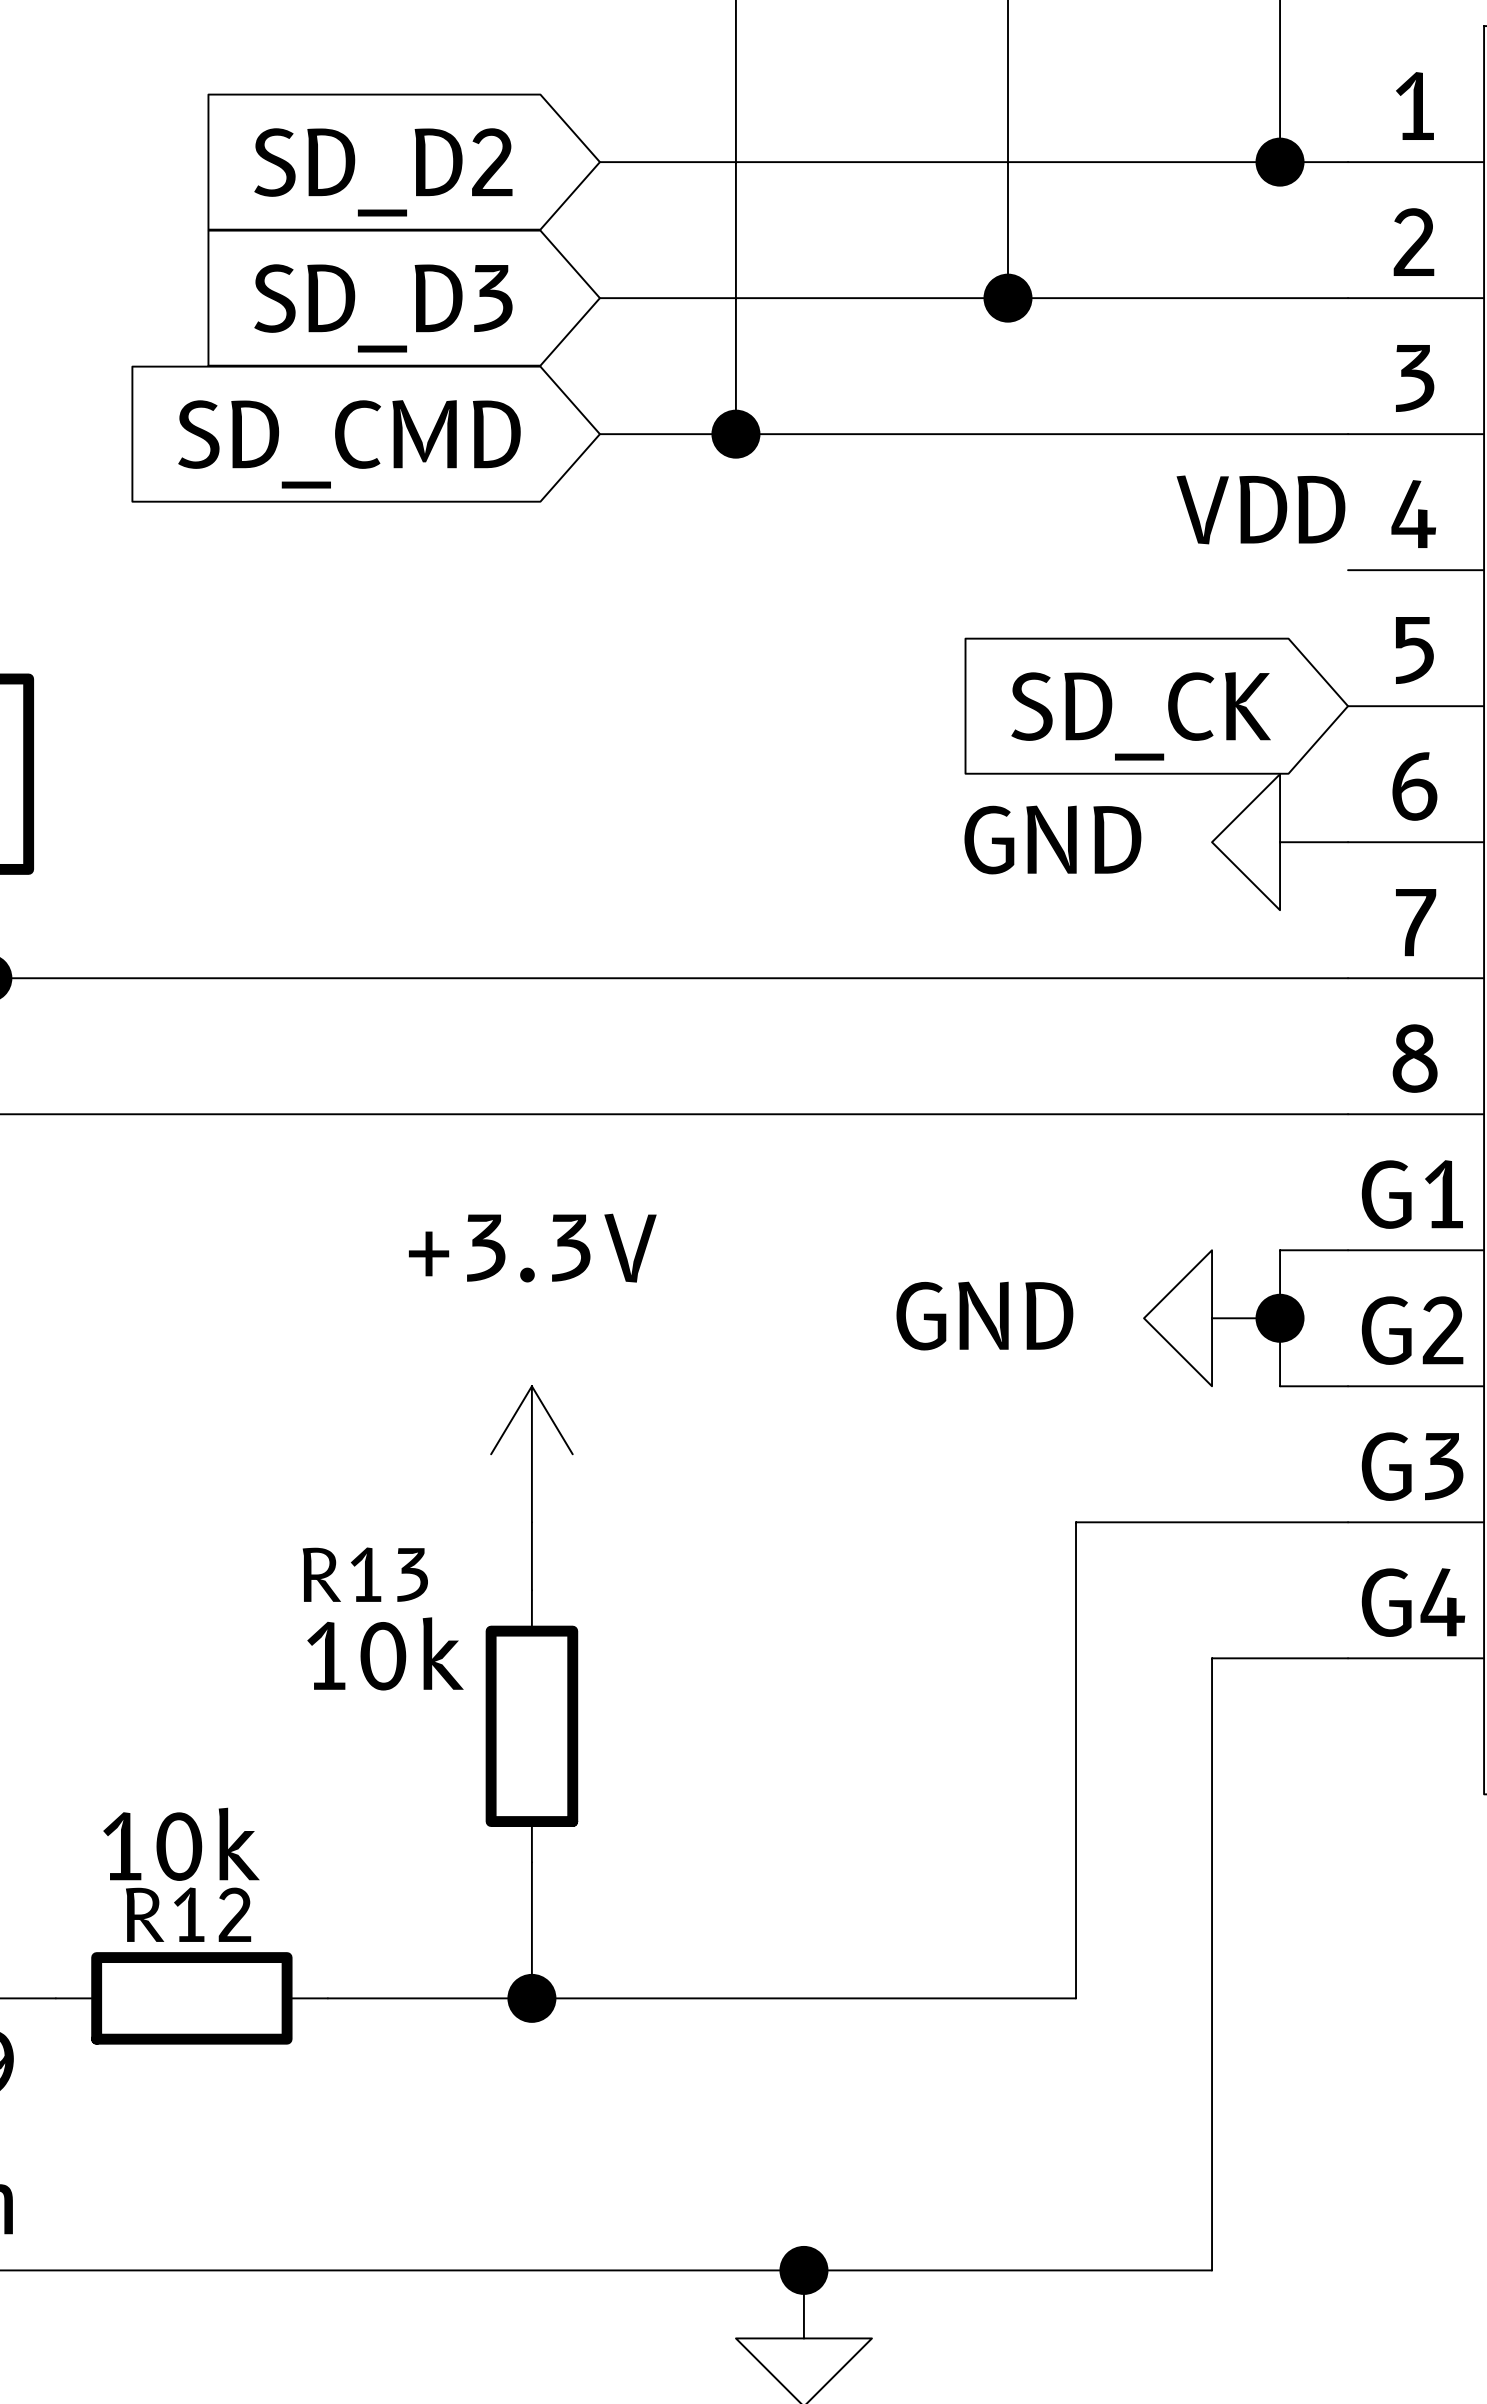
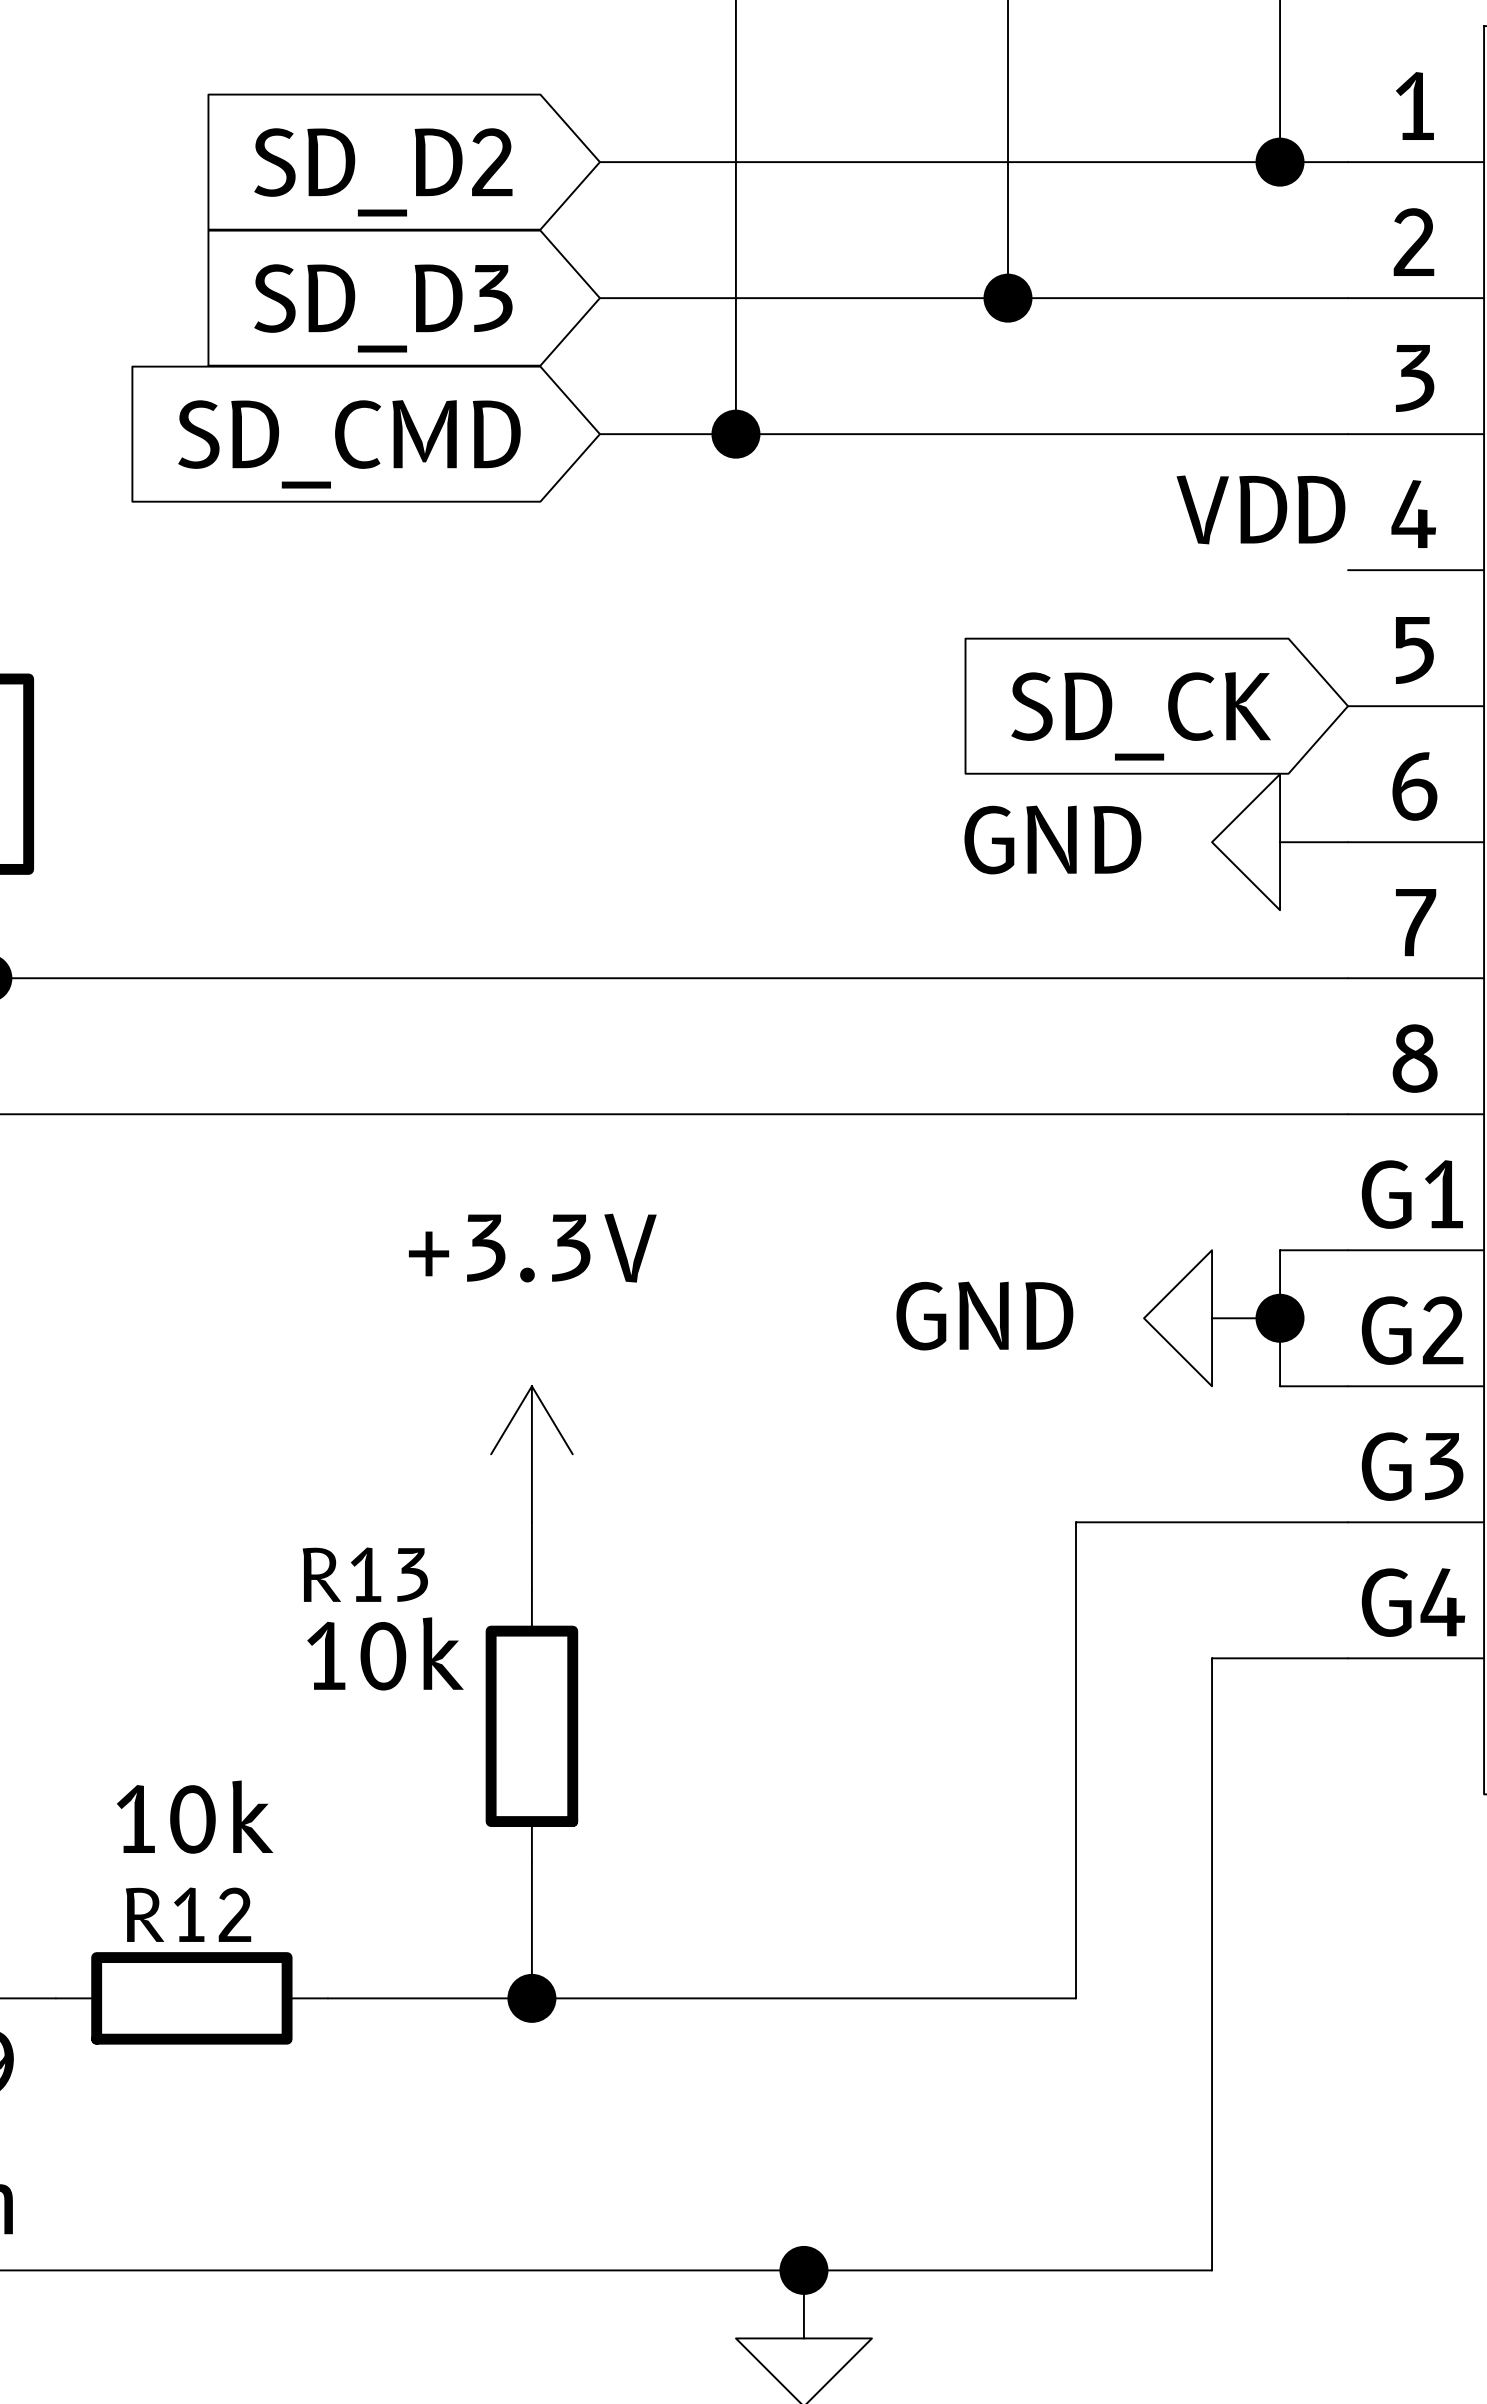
R12 value position: 10k (181, 1844) -> 10k (195, 1817)

